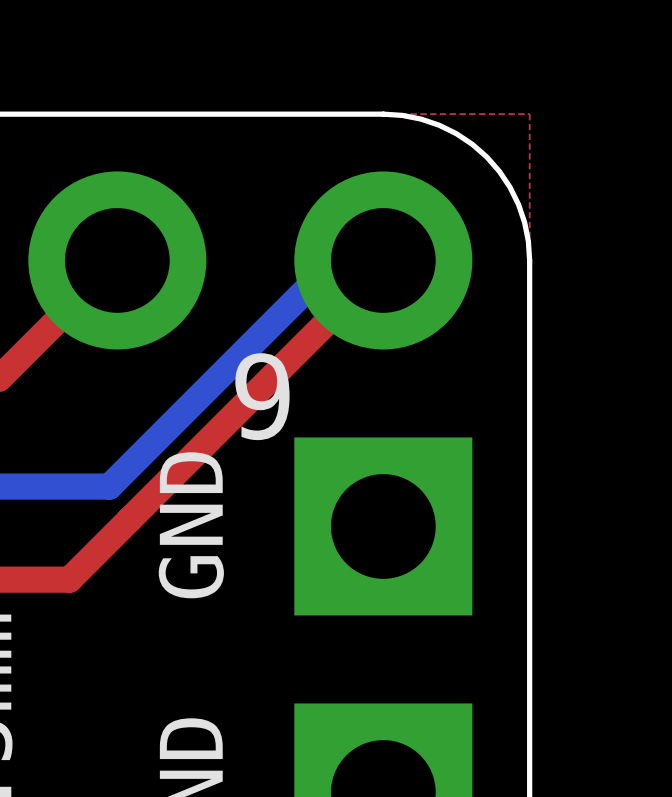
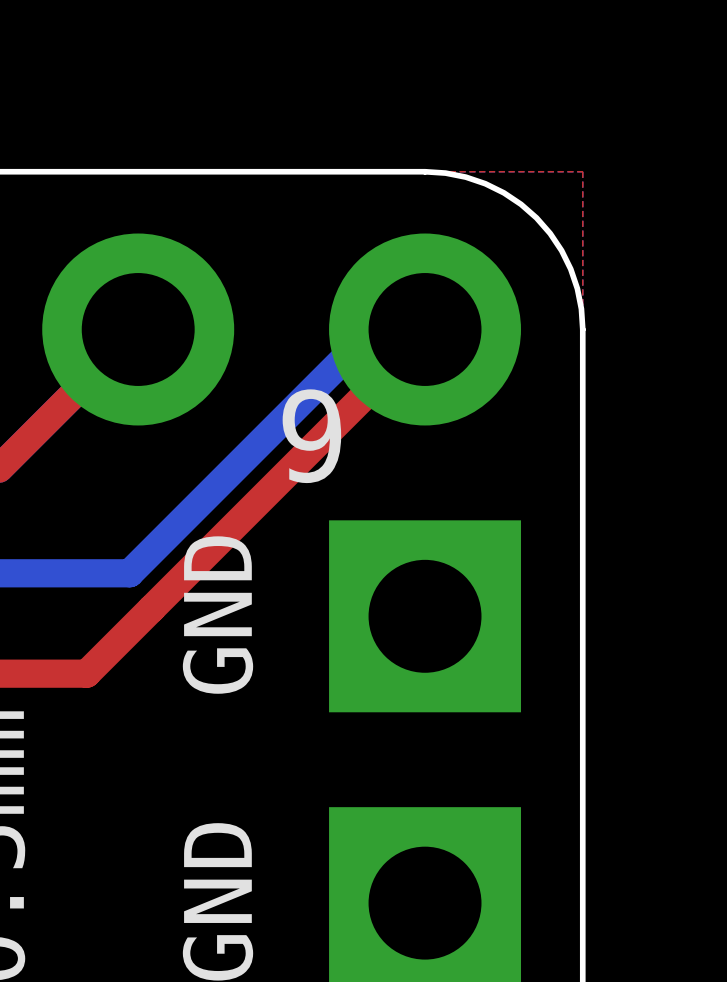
text position: 9 (262, 396) -> 9 (311, 436)

